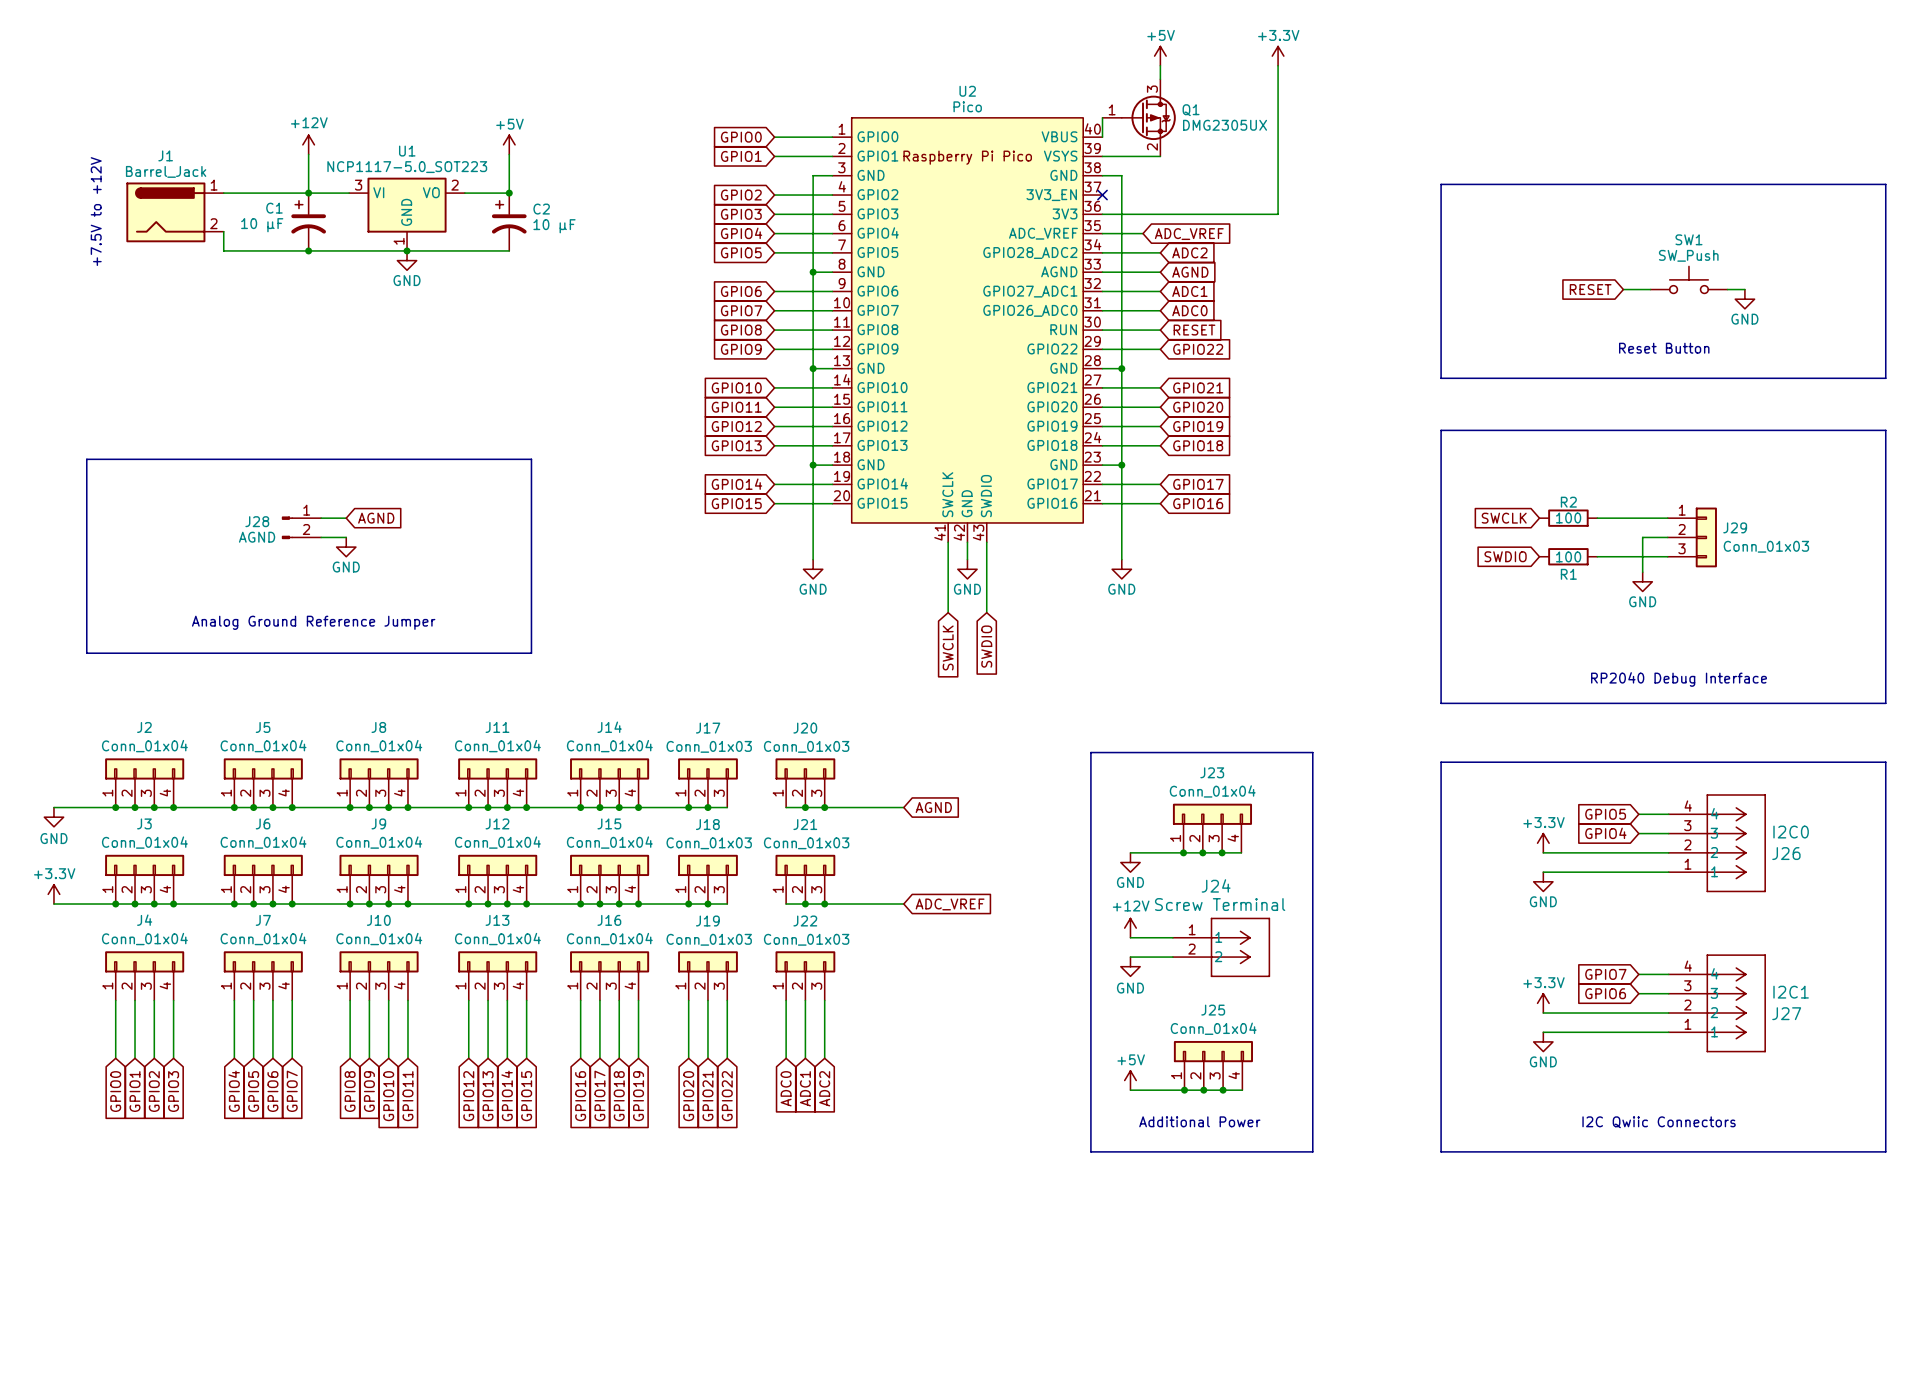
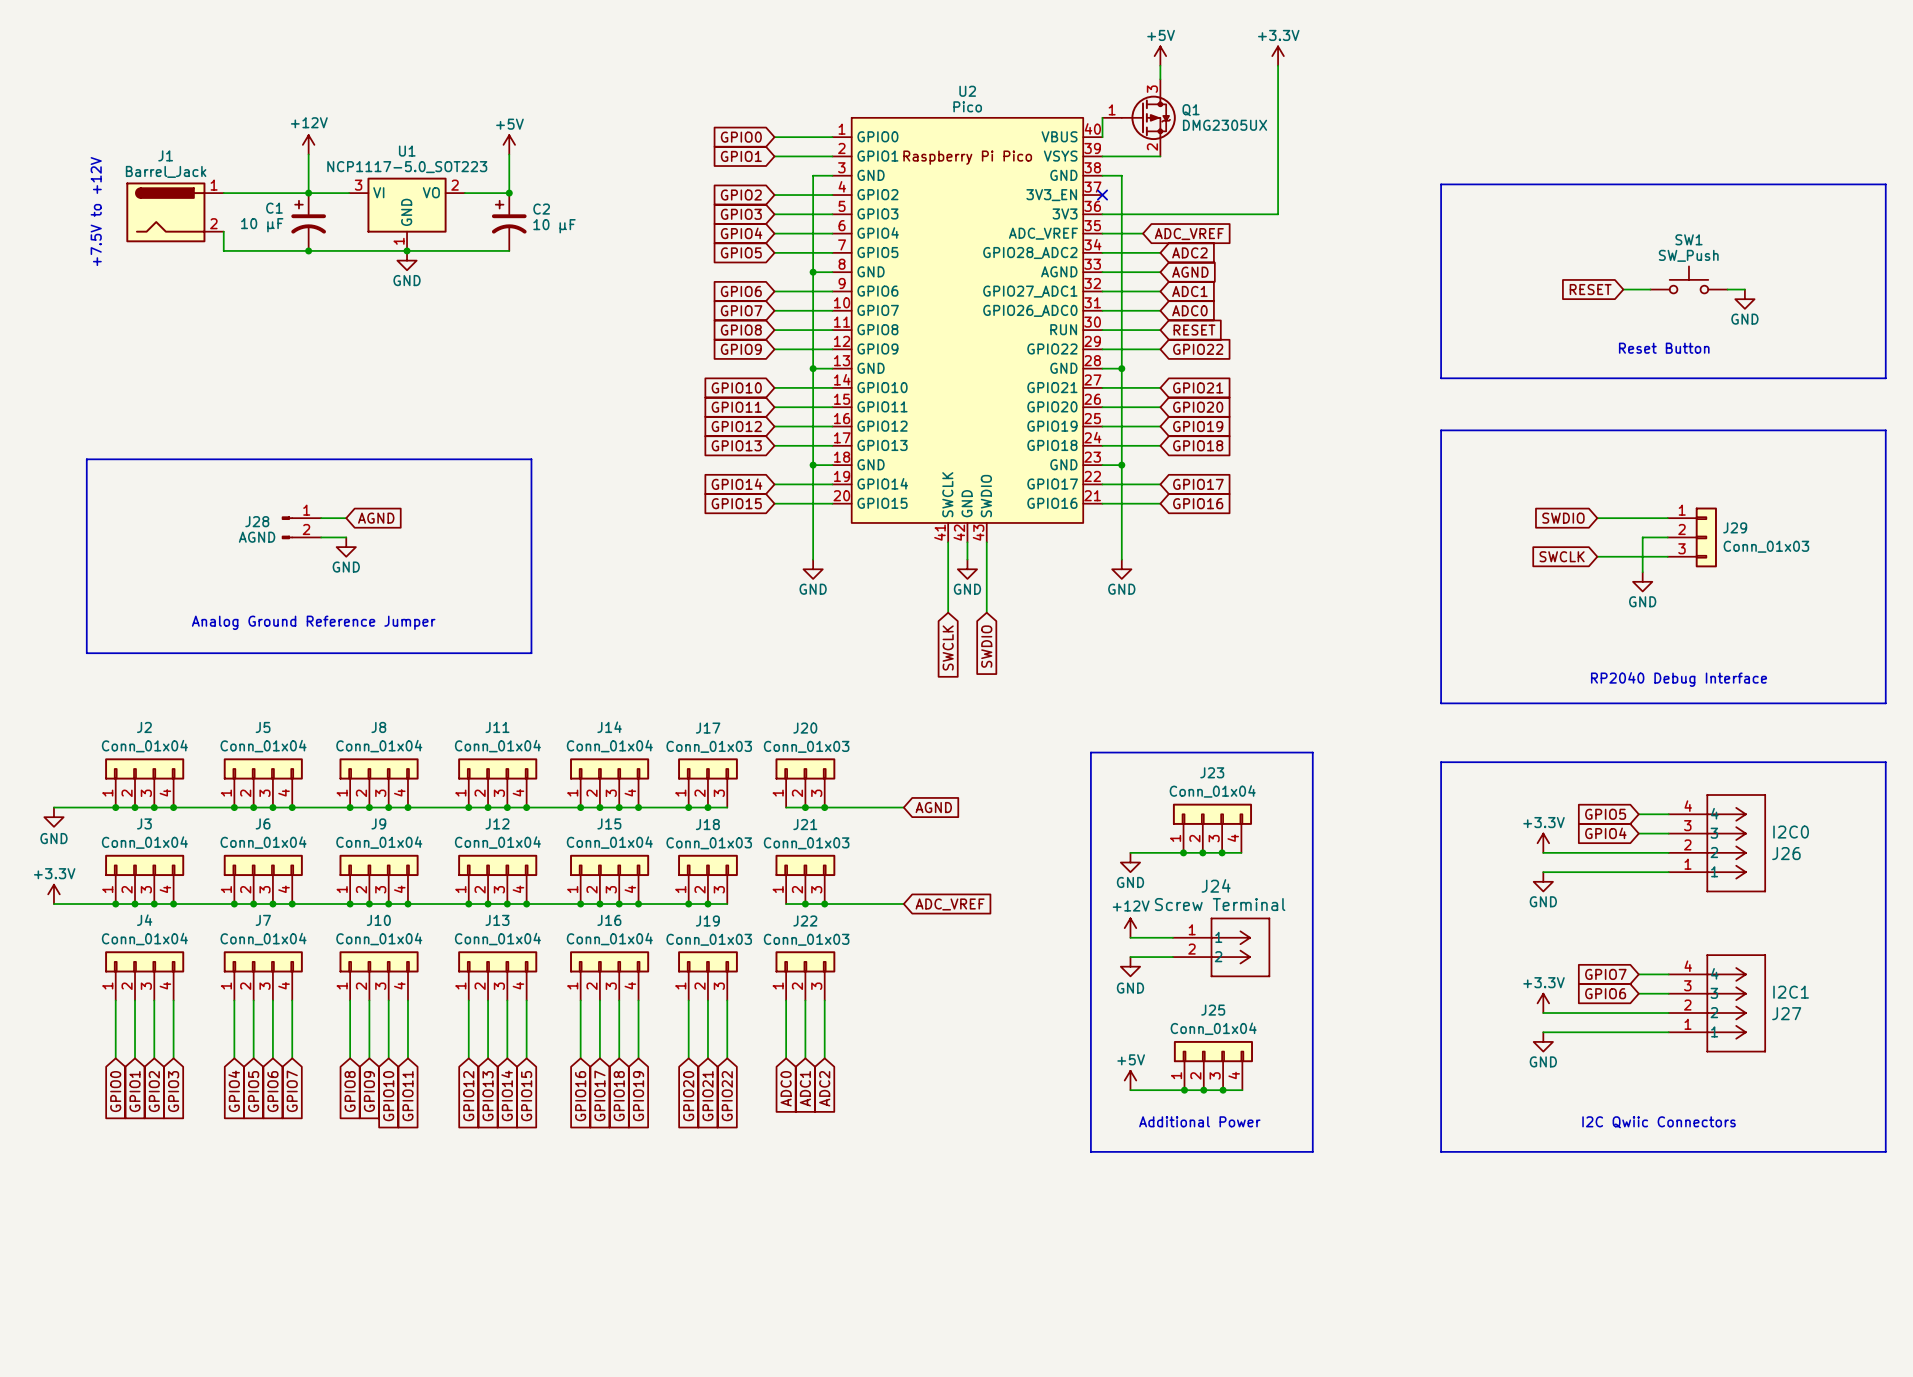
global label position: SWCLK (1504, 518) -> SWCLK (1562, 556)
R2: 100 (1568, 518) -> none
global label position: SWDIO (1505, 556) -> SWDIO (1563, 518)
R1: 100 (1568, 556) -> none

